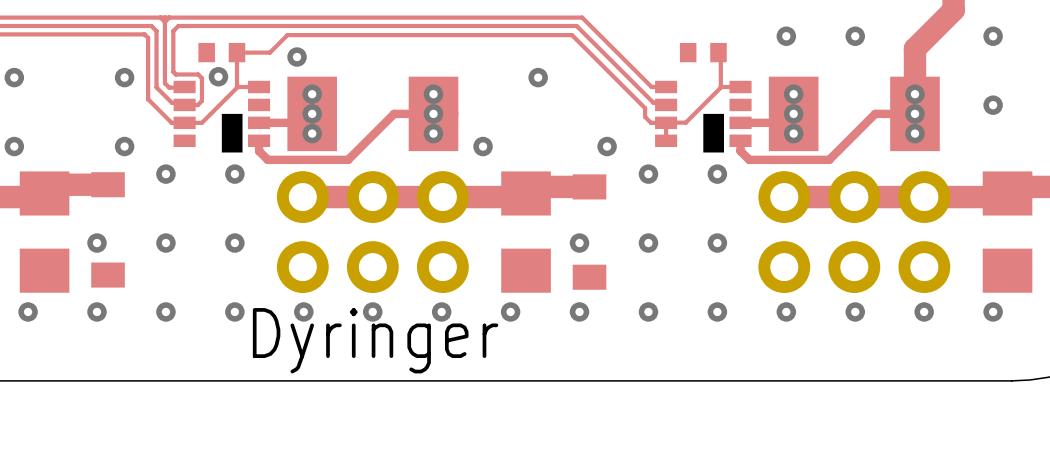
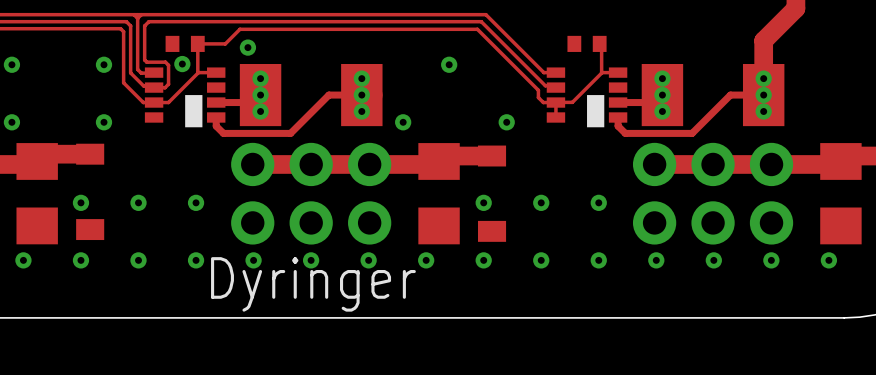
via: (786, 36) -> none
via: (855, 36) -> none
via: (993, 36) -> none
via: (993, 105) -> none
via: (165, 174) -> none
via: (234, 174) -> none
via: (648, 174) -> none
via: (717, 174) -> none

